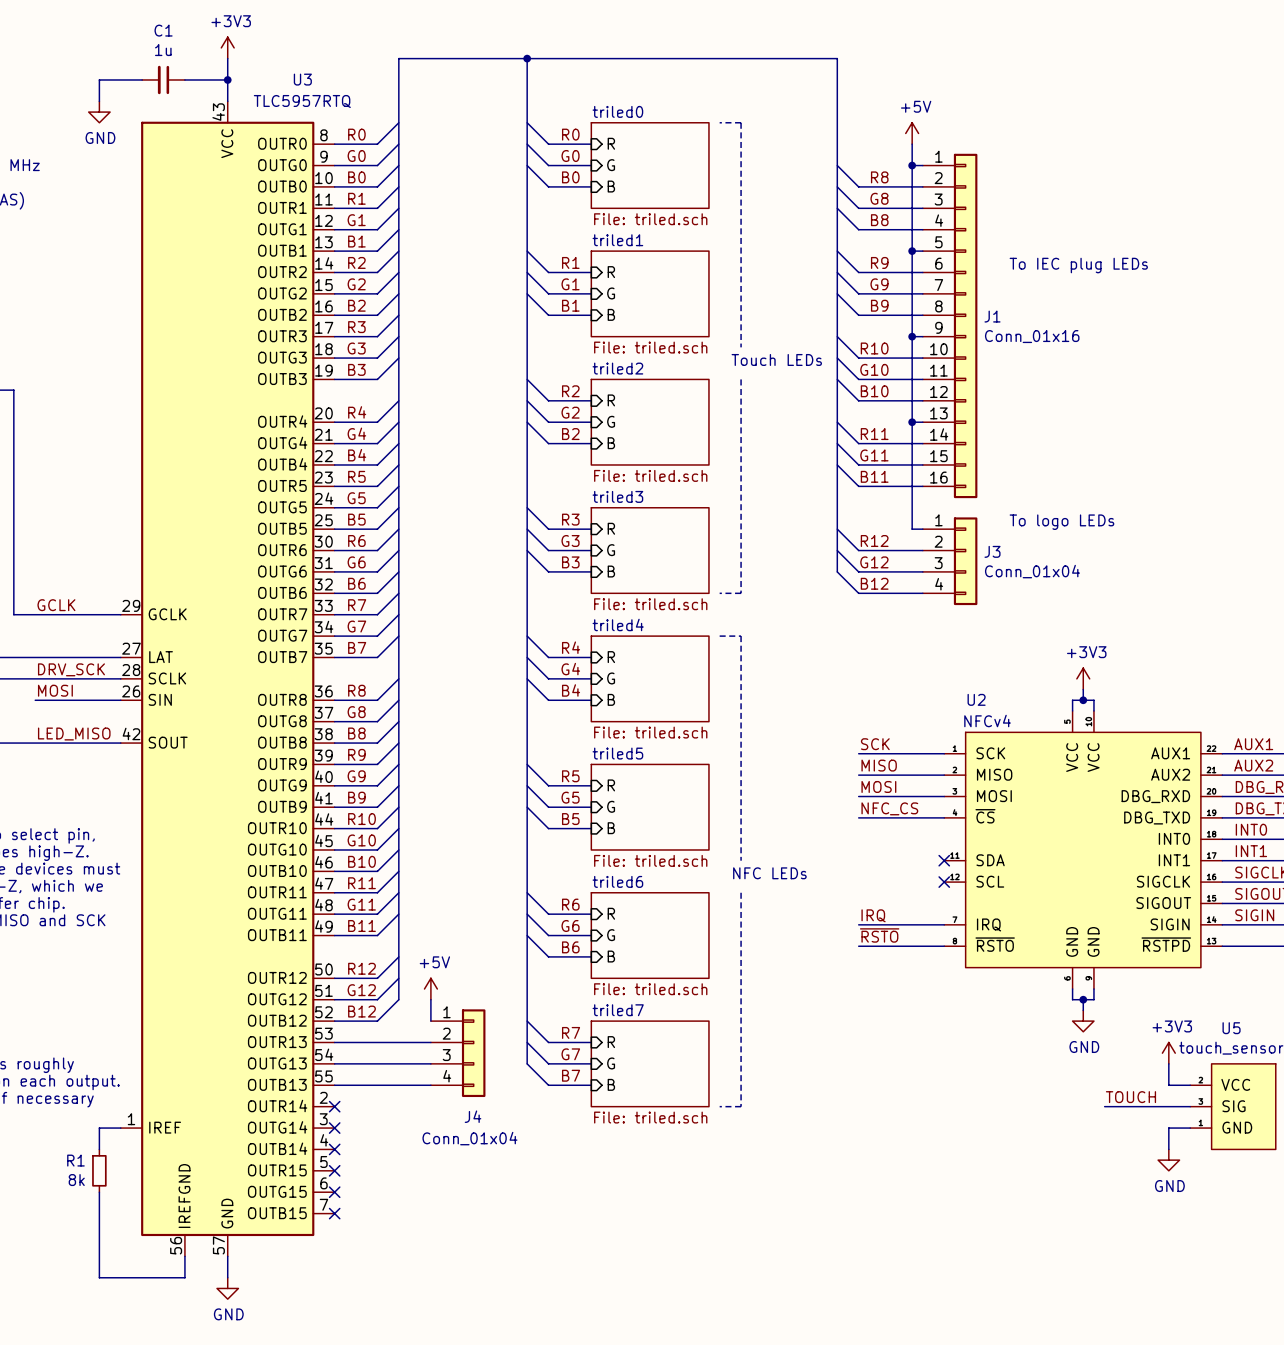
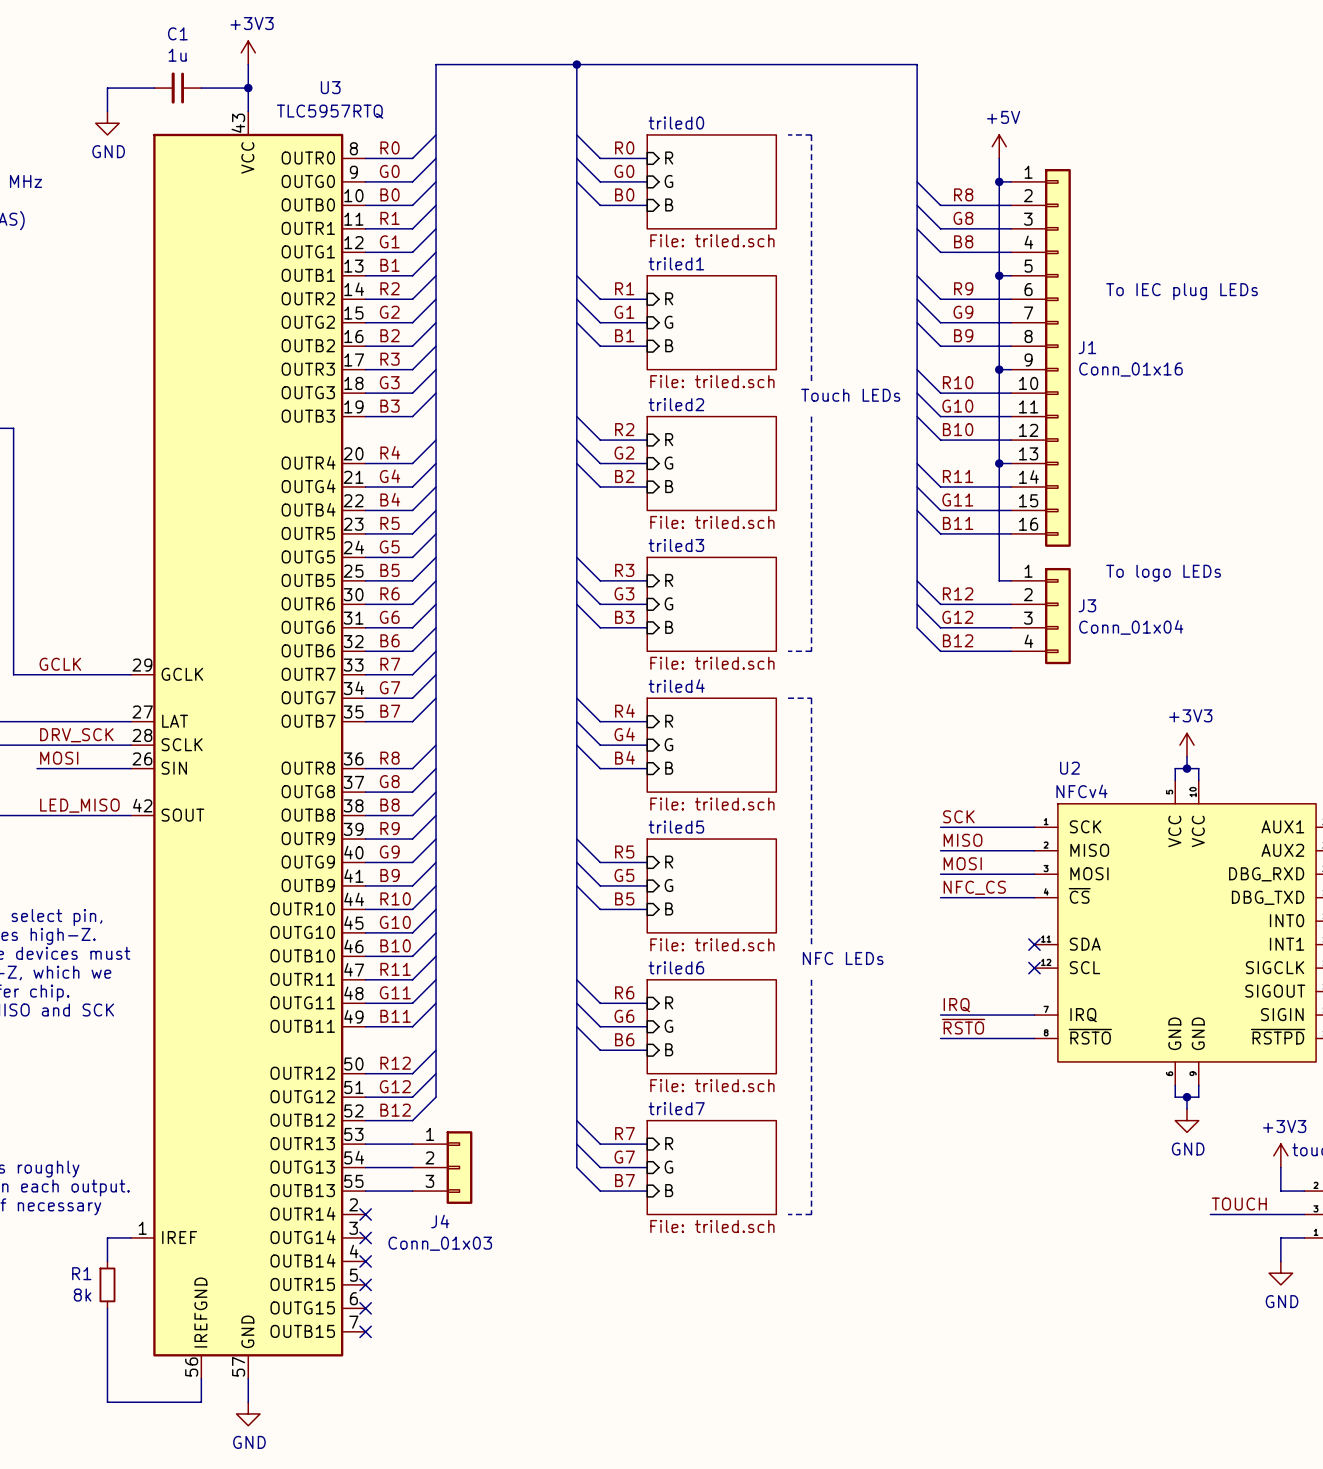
power symbol: +5V (430, 989) -> none
wire: (430, 999) (430, 1021) -> none
J4 symbol: [430, 1009, 486, 1098] -> [412, 1131, 473, 1204]
J4 name position: J4 (473, 1116) -> J4 (440, 1221)
J4 value: Conn_01x04 (469, 1138) -> Conn_01x03 (440, 1243)

